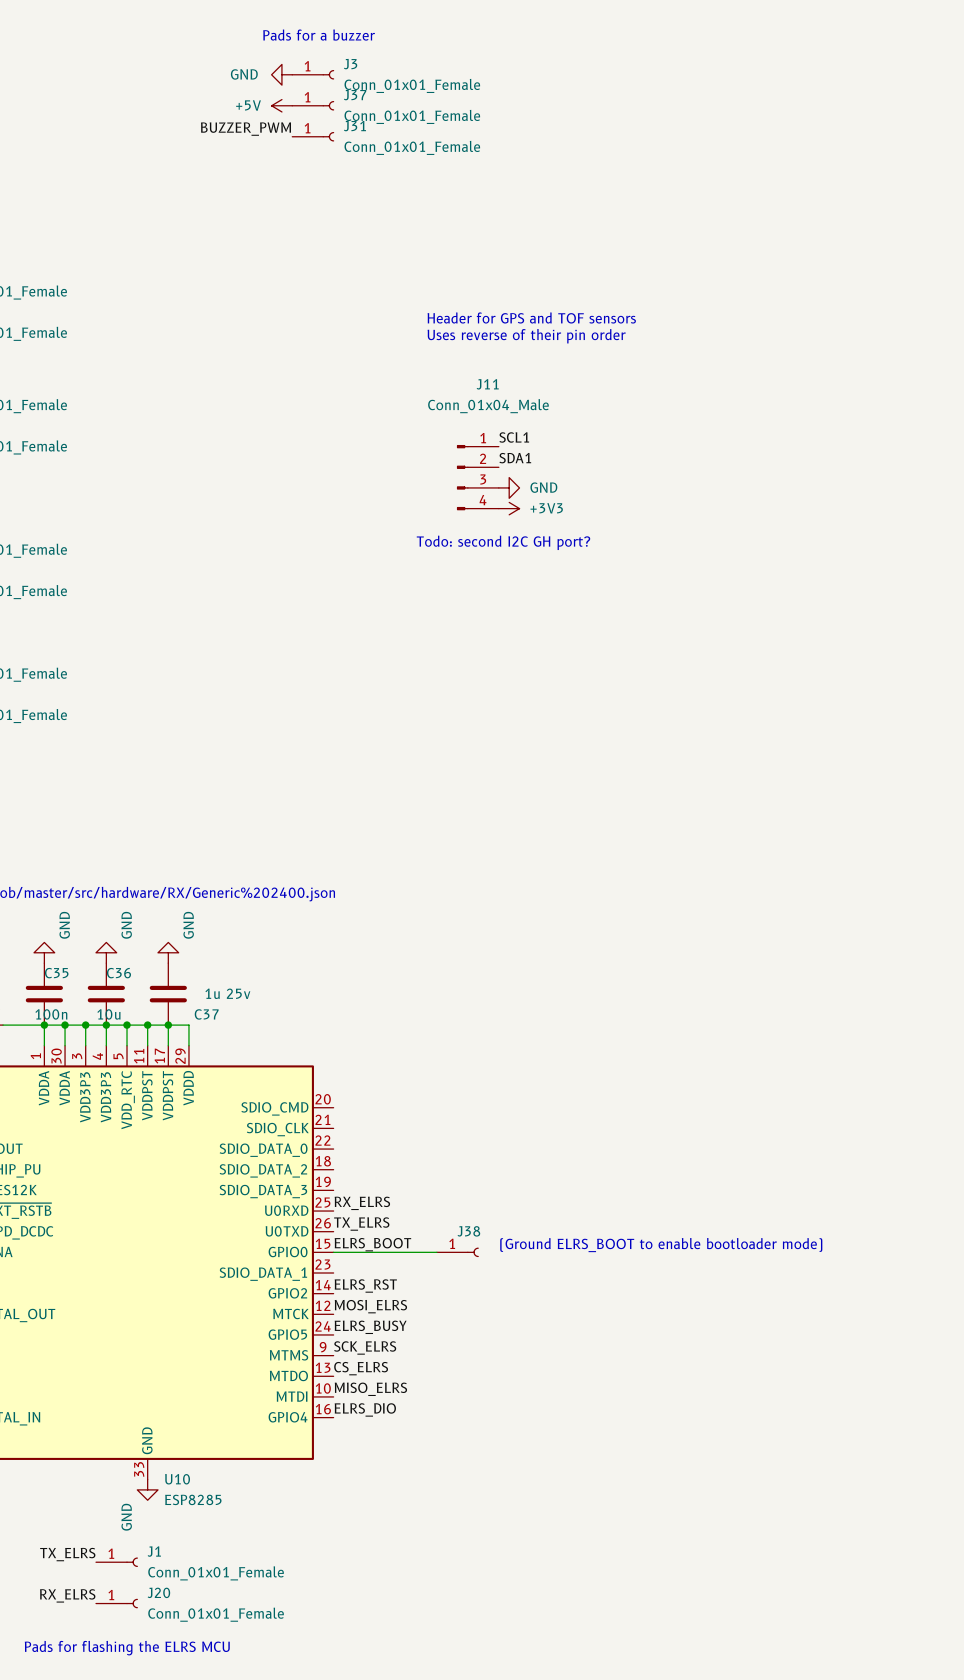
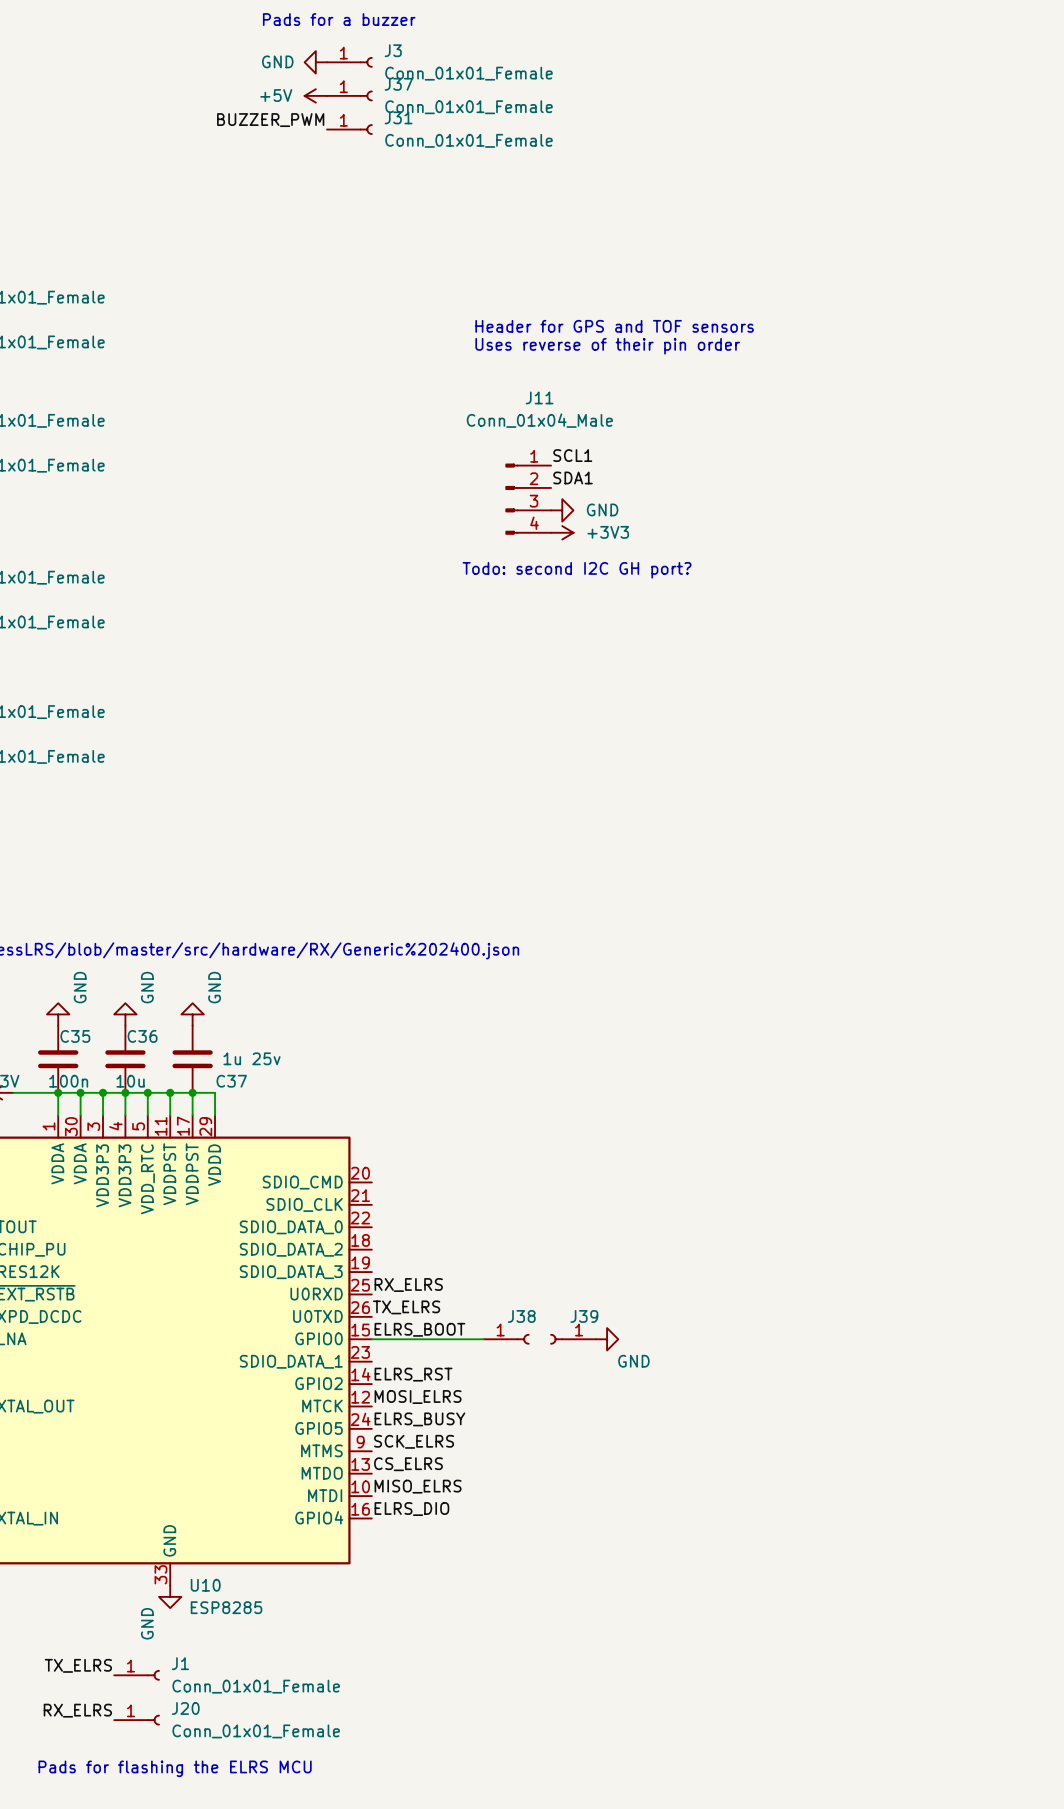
text: (Ground ELRS_BOOT to enable bootloader mode) (661, 1245) -> none
J39: none -> (573, 1339)
power symbol: none -> GND (607, 1339)

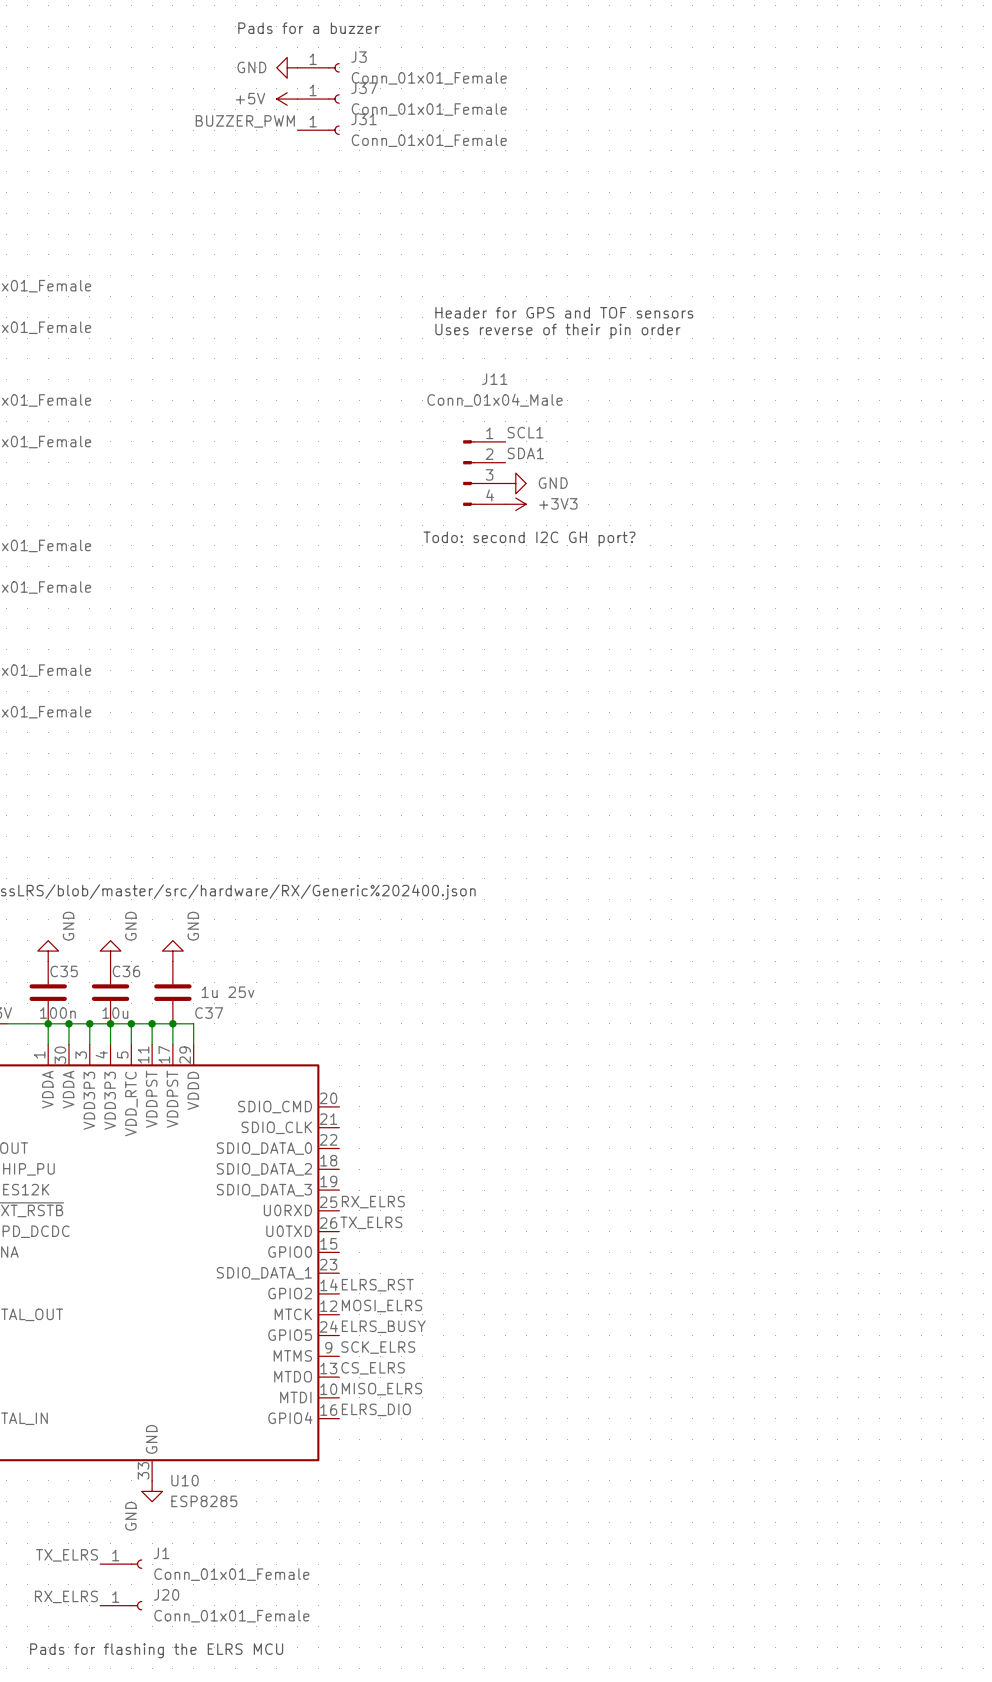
label: ELRS_BOOT (419, 1329) -> none
wire: (371, 1339) (483, 1339) -> none
J38: (506, 1339) -> none
J39: (573, 1339) -> none
power symbol: GND (607, 1339) -> none

